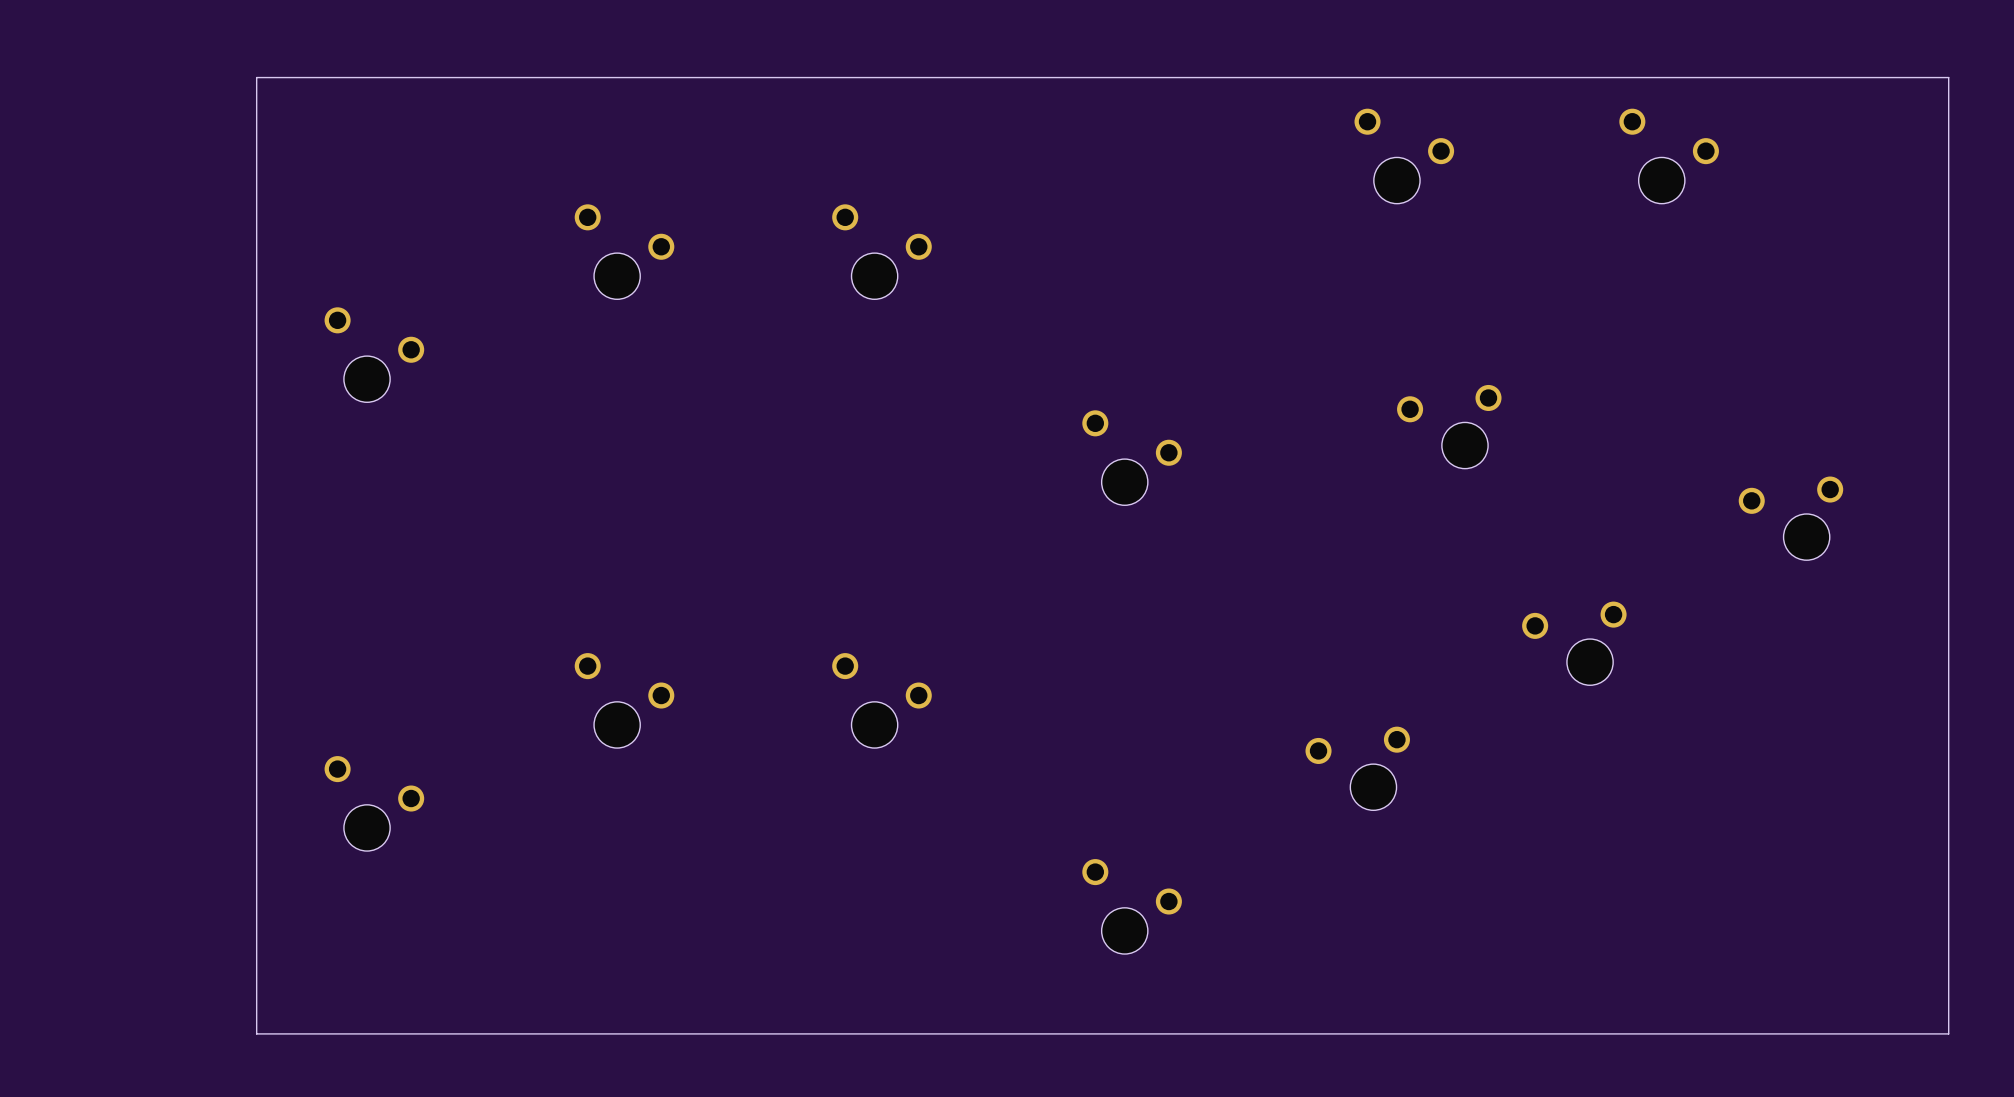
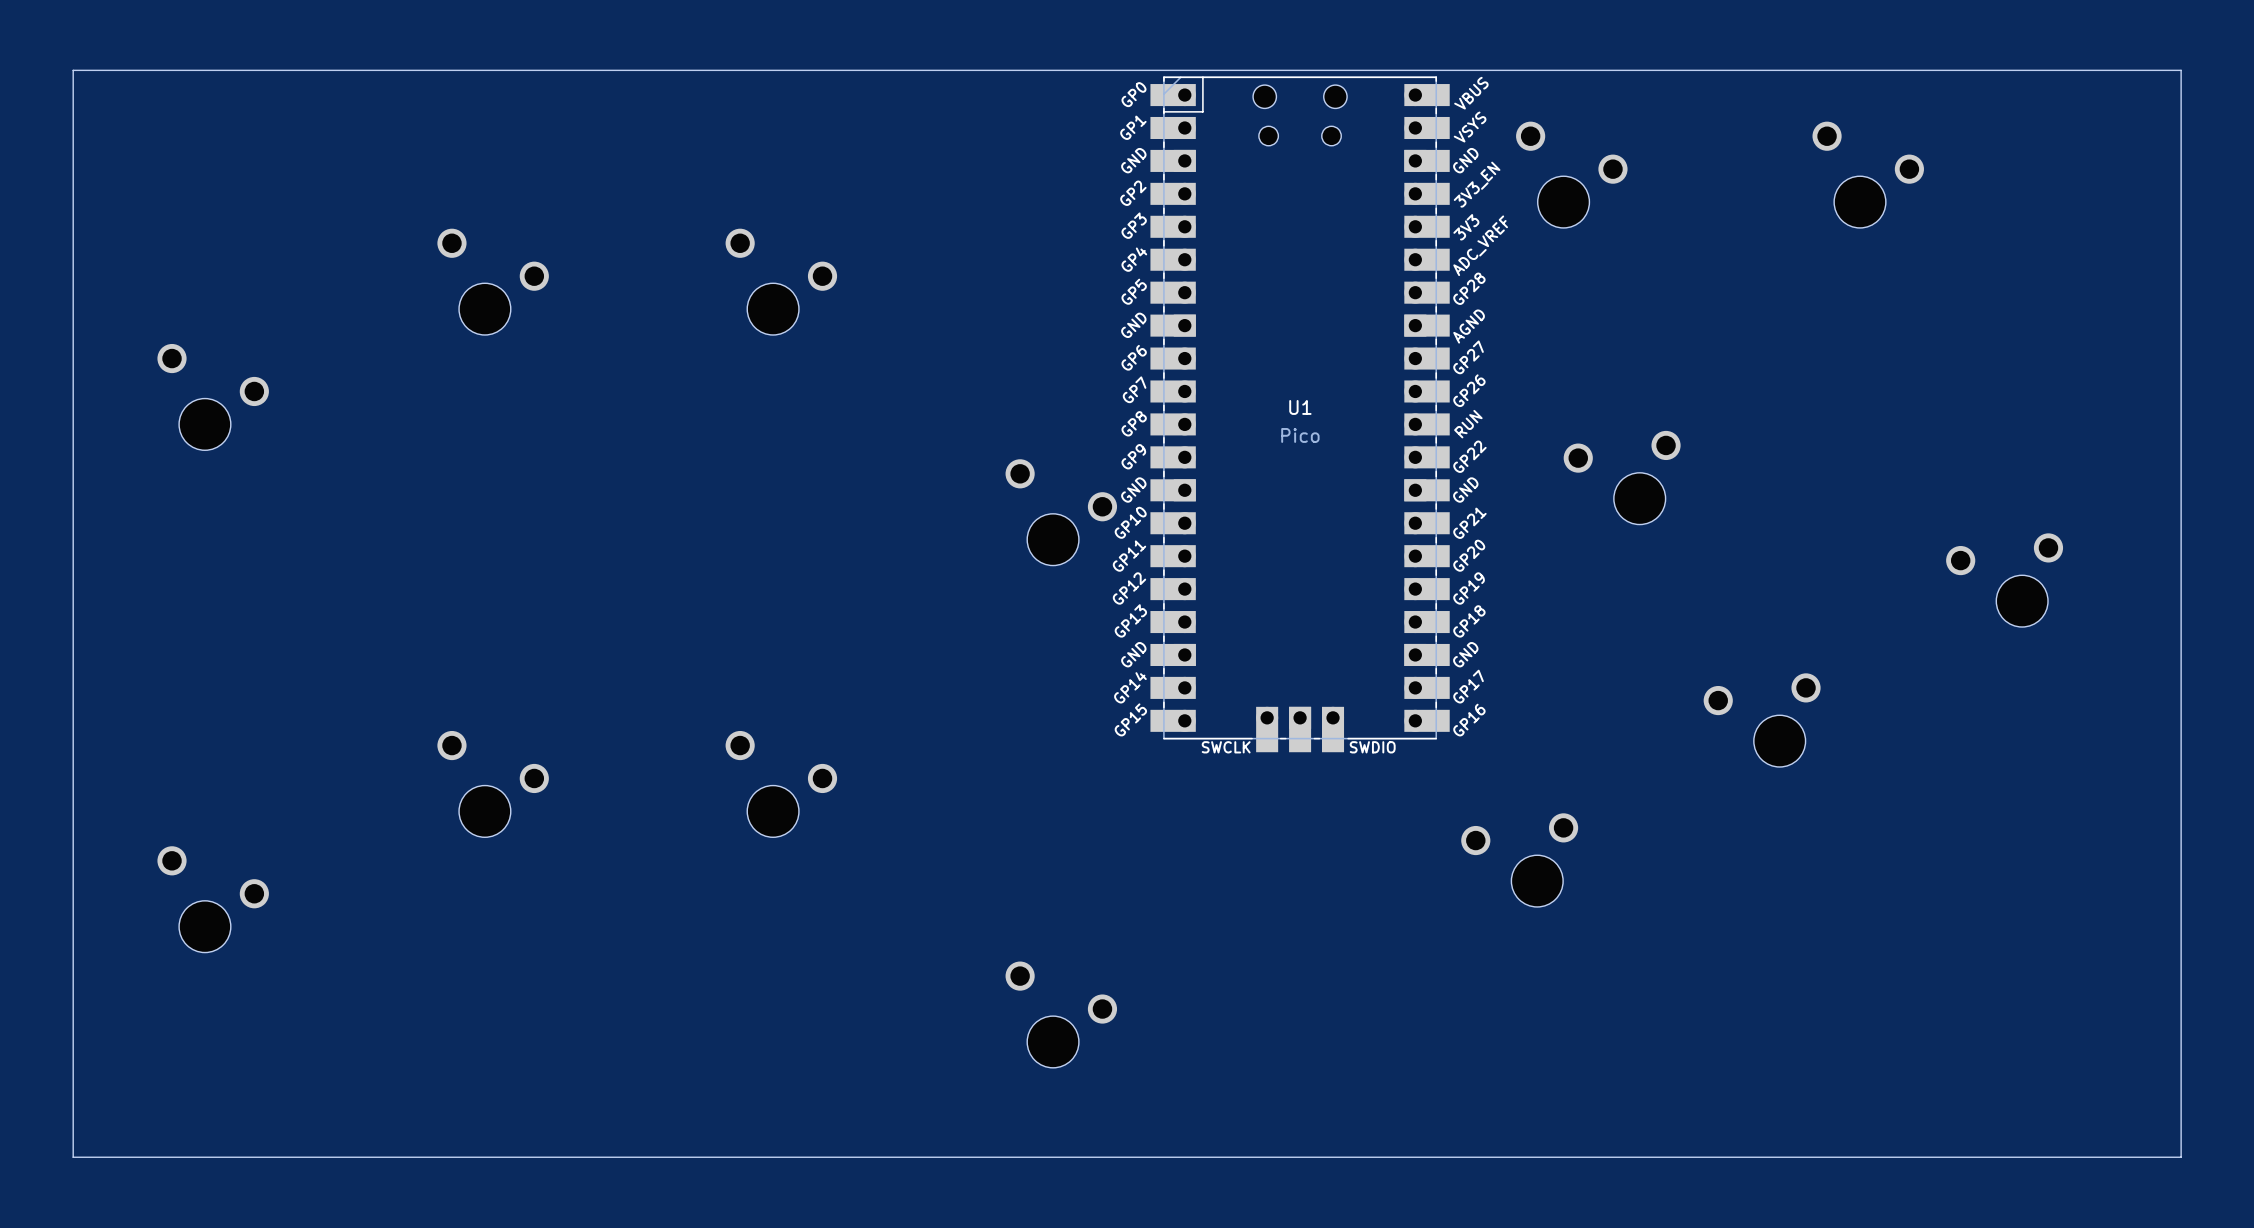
board edge: (1948, 77) (256, 77) (256, 1033) -> (2181, 86) (2181, 70) (73, 70) (73, 1157) (287, 1157)
part: none -> (493, 281)
part position: (624, 251) -> (781, 281)
part: (881, 251) -> none
part: none -> (213, 397)
part: (374, 354) -> none
U1: none -> Pico (1300, 414)
part: none -> (1061, 512)
part: (1132, 457) -> none
part: none -> (493, 784)
part position: (624, 700) -> (781, 784)
part: (881, 700) -> none
part: none -> (213, 899)
part: (374, 803) -> none
part: none -> (1061, 1014)
part: (1132, 906) -> none

